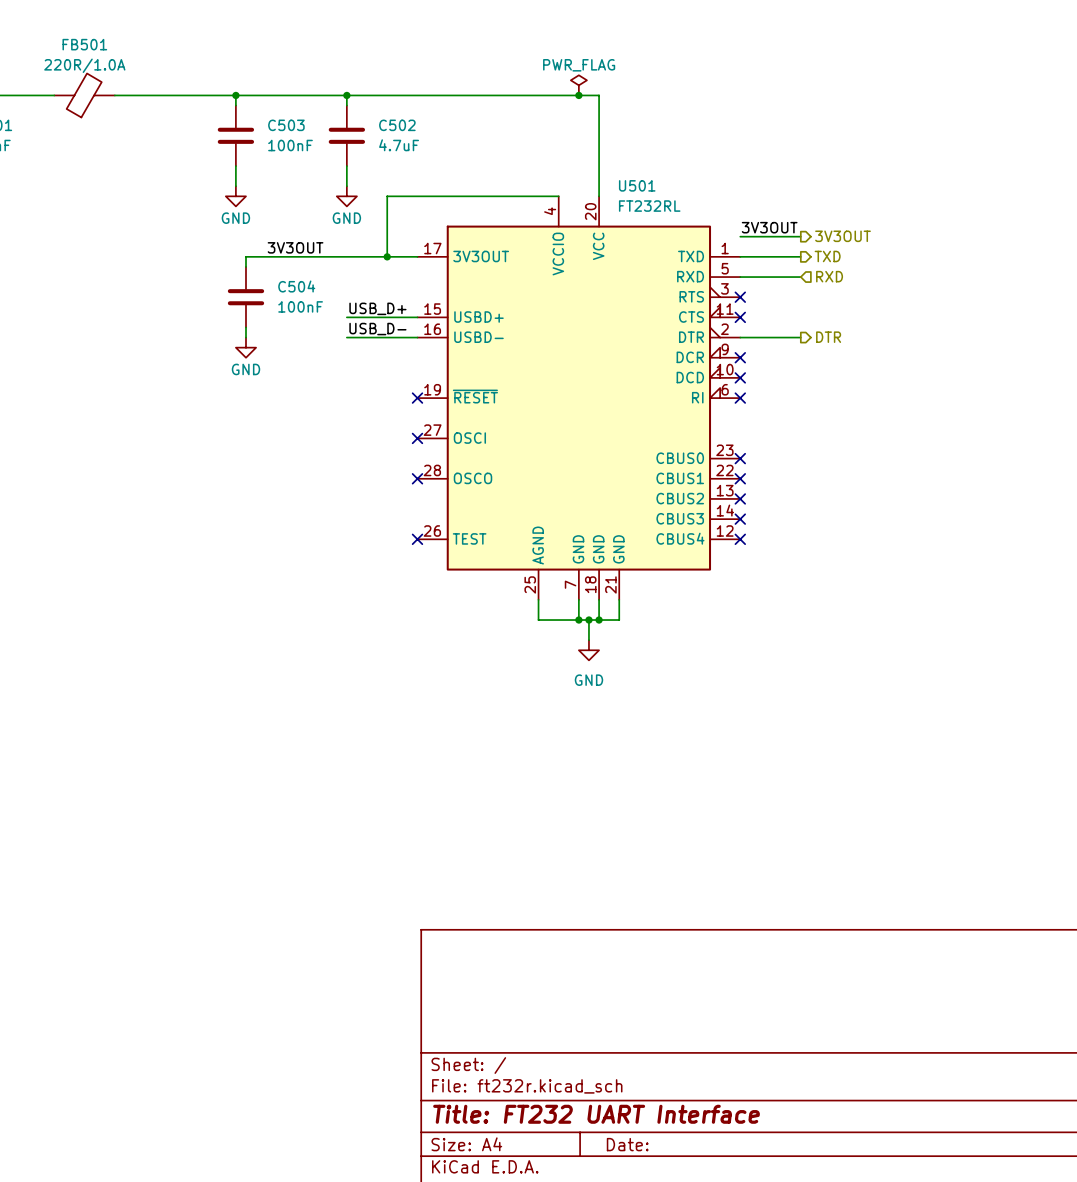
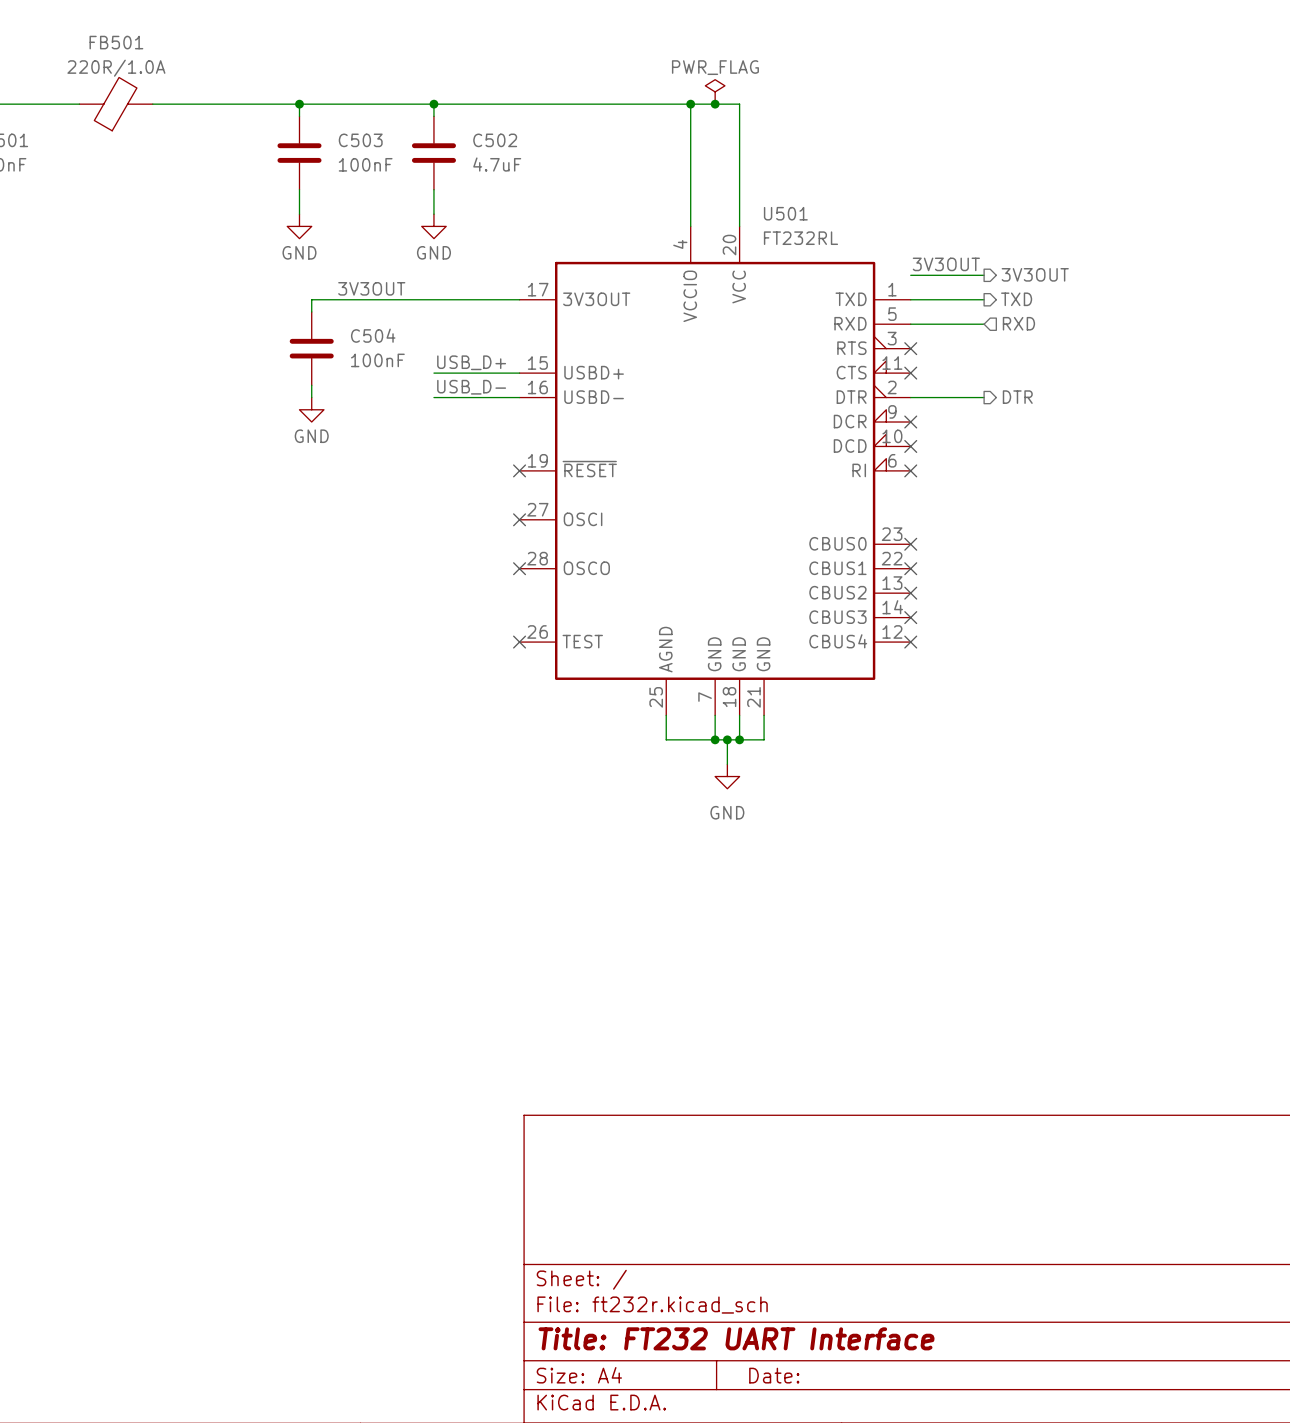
junction: none -> (690, 104)
wire: (558, 196) (387, 196) (387, 256) -> (690, 226) (690, 104)
junction: (387, 256) -> none

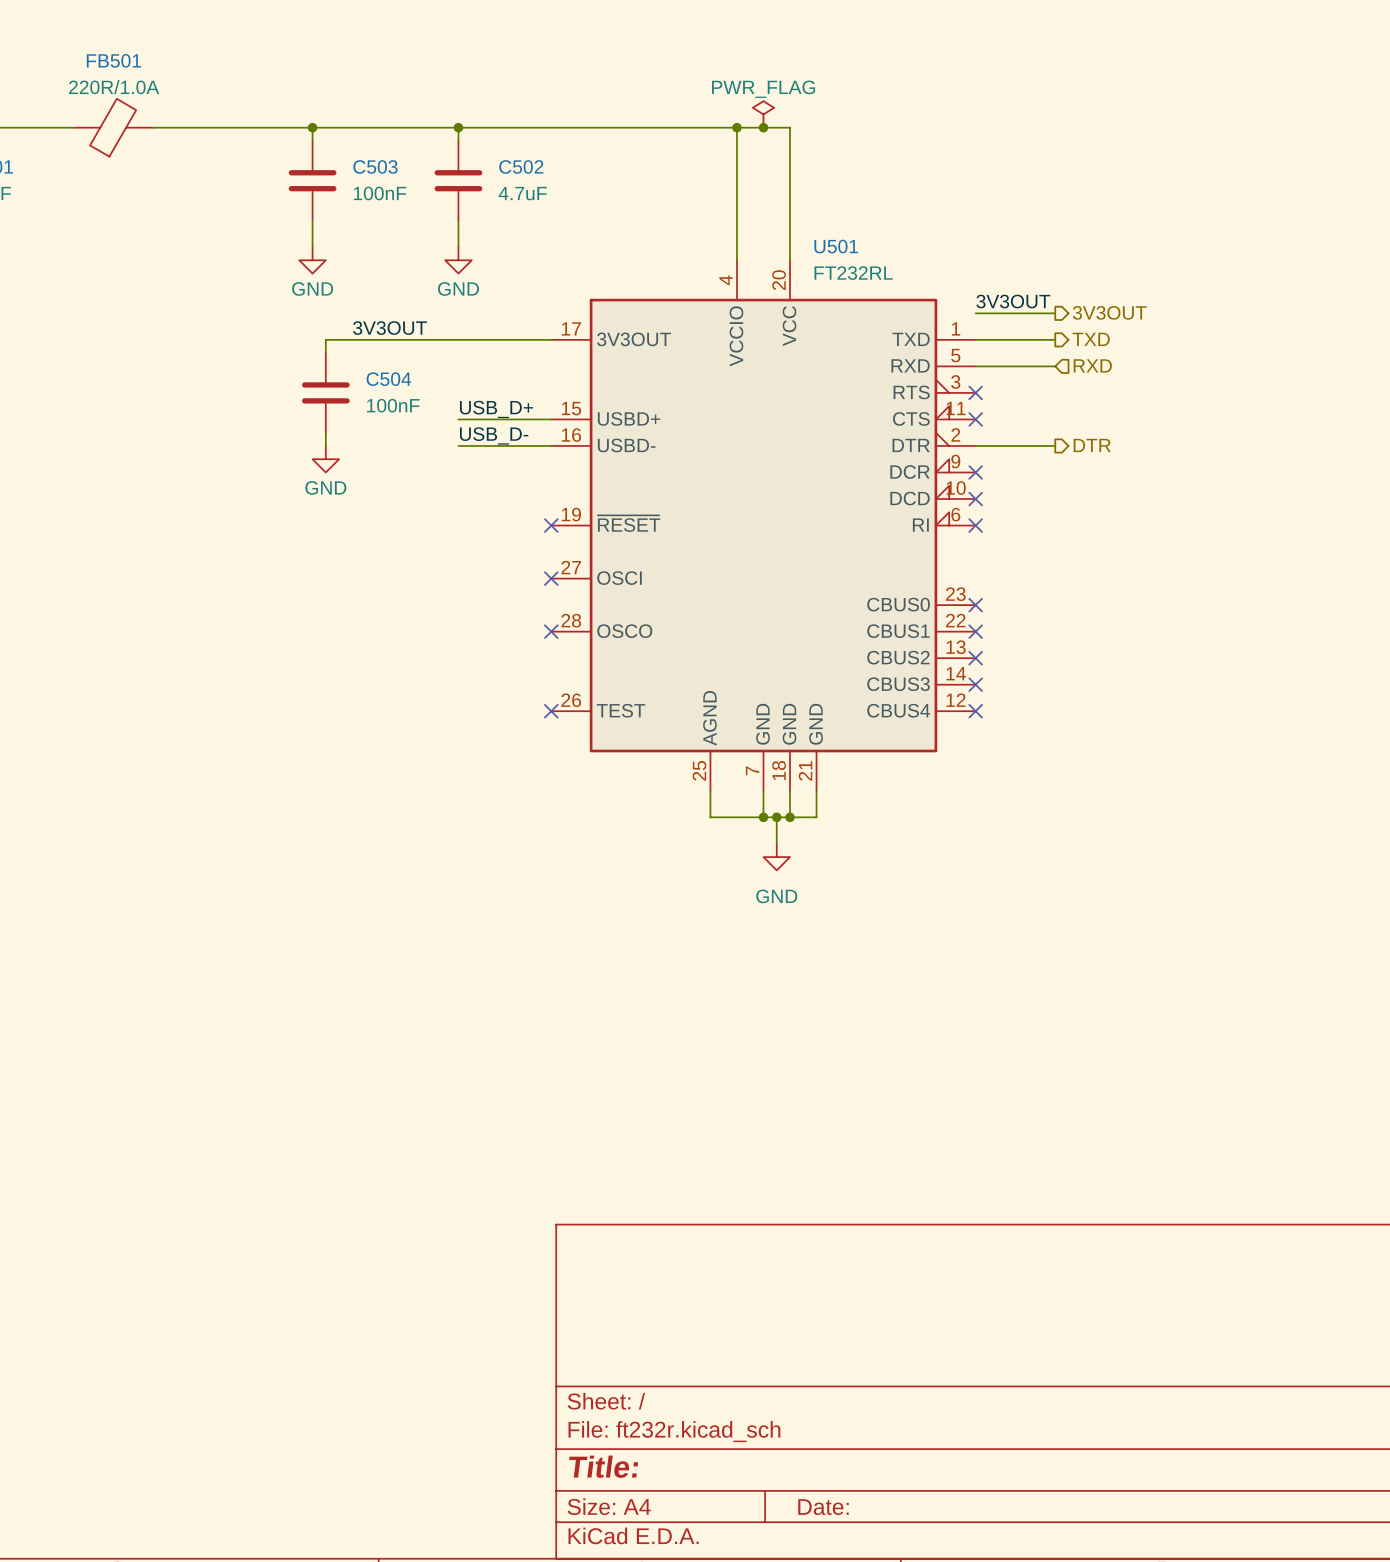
title block: Title: FT232 UART Interface (736, 1338) -> Title: (603, 1466)

